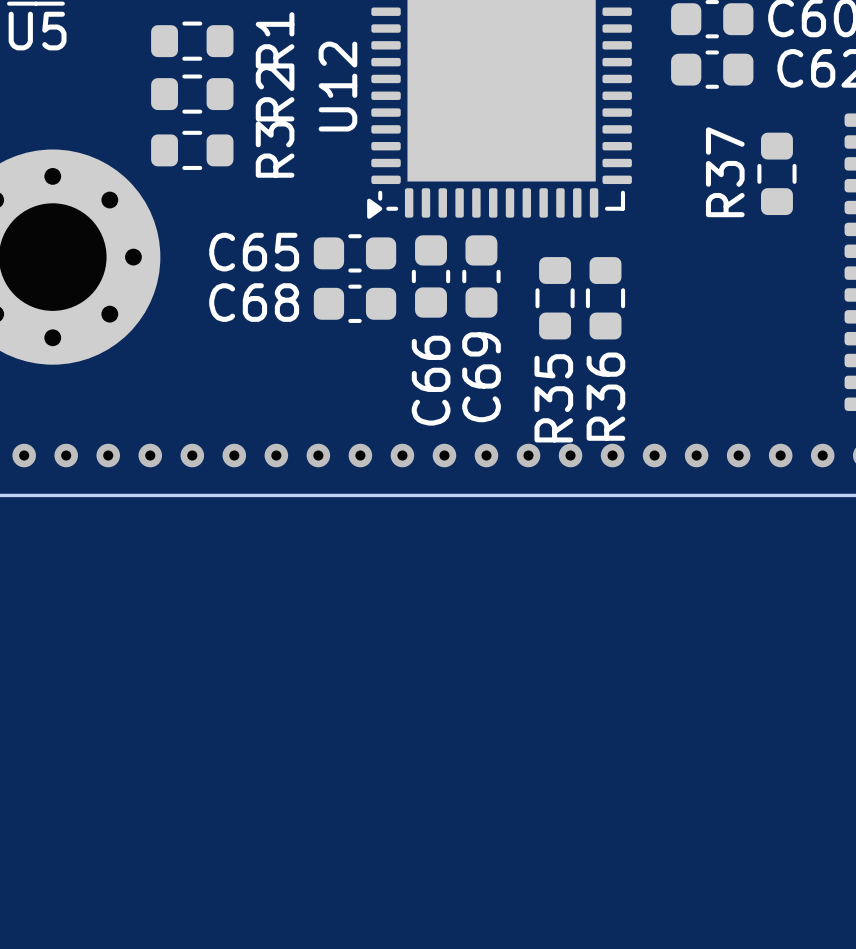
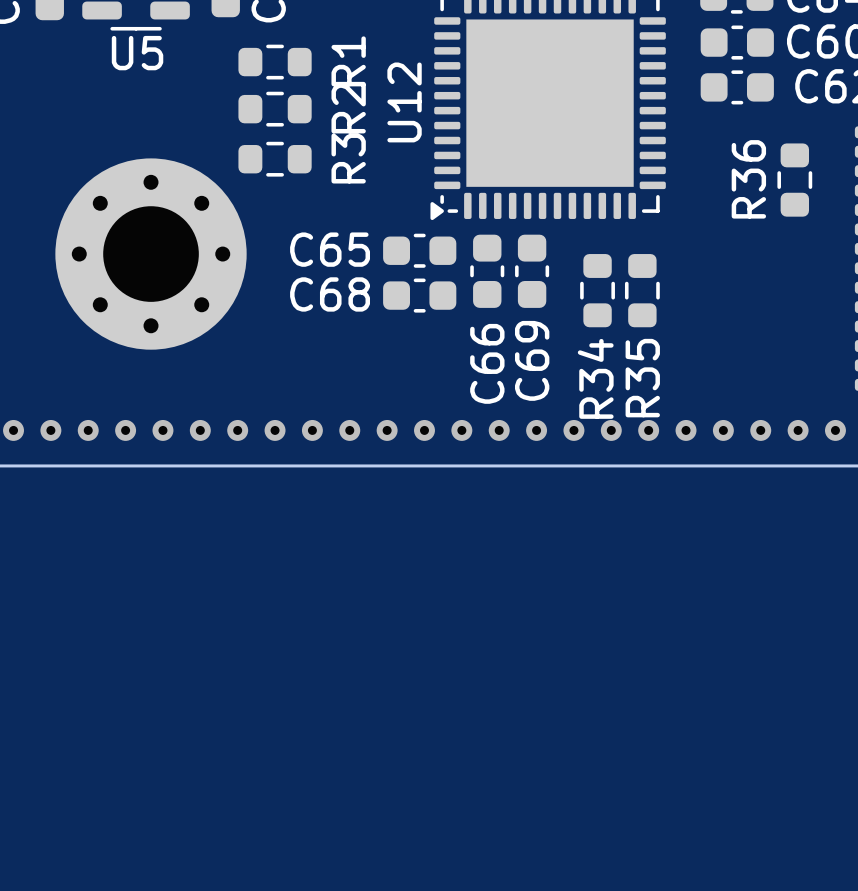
R37 name: R37 (725, 172) -> R36 (748, 179)
R36 name: R36 (605, 396) -> R35 (642, 378)
R35 name: R35 (553, 398) -> R34 (595, 378)

